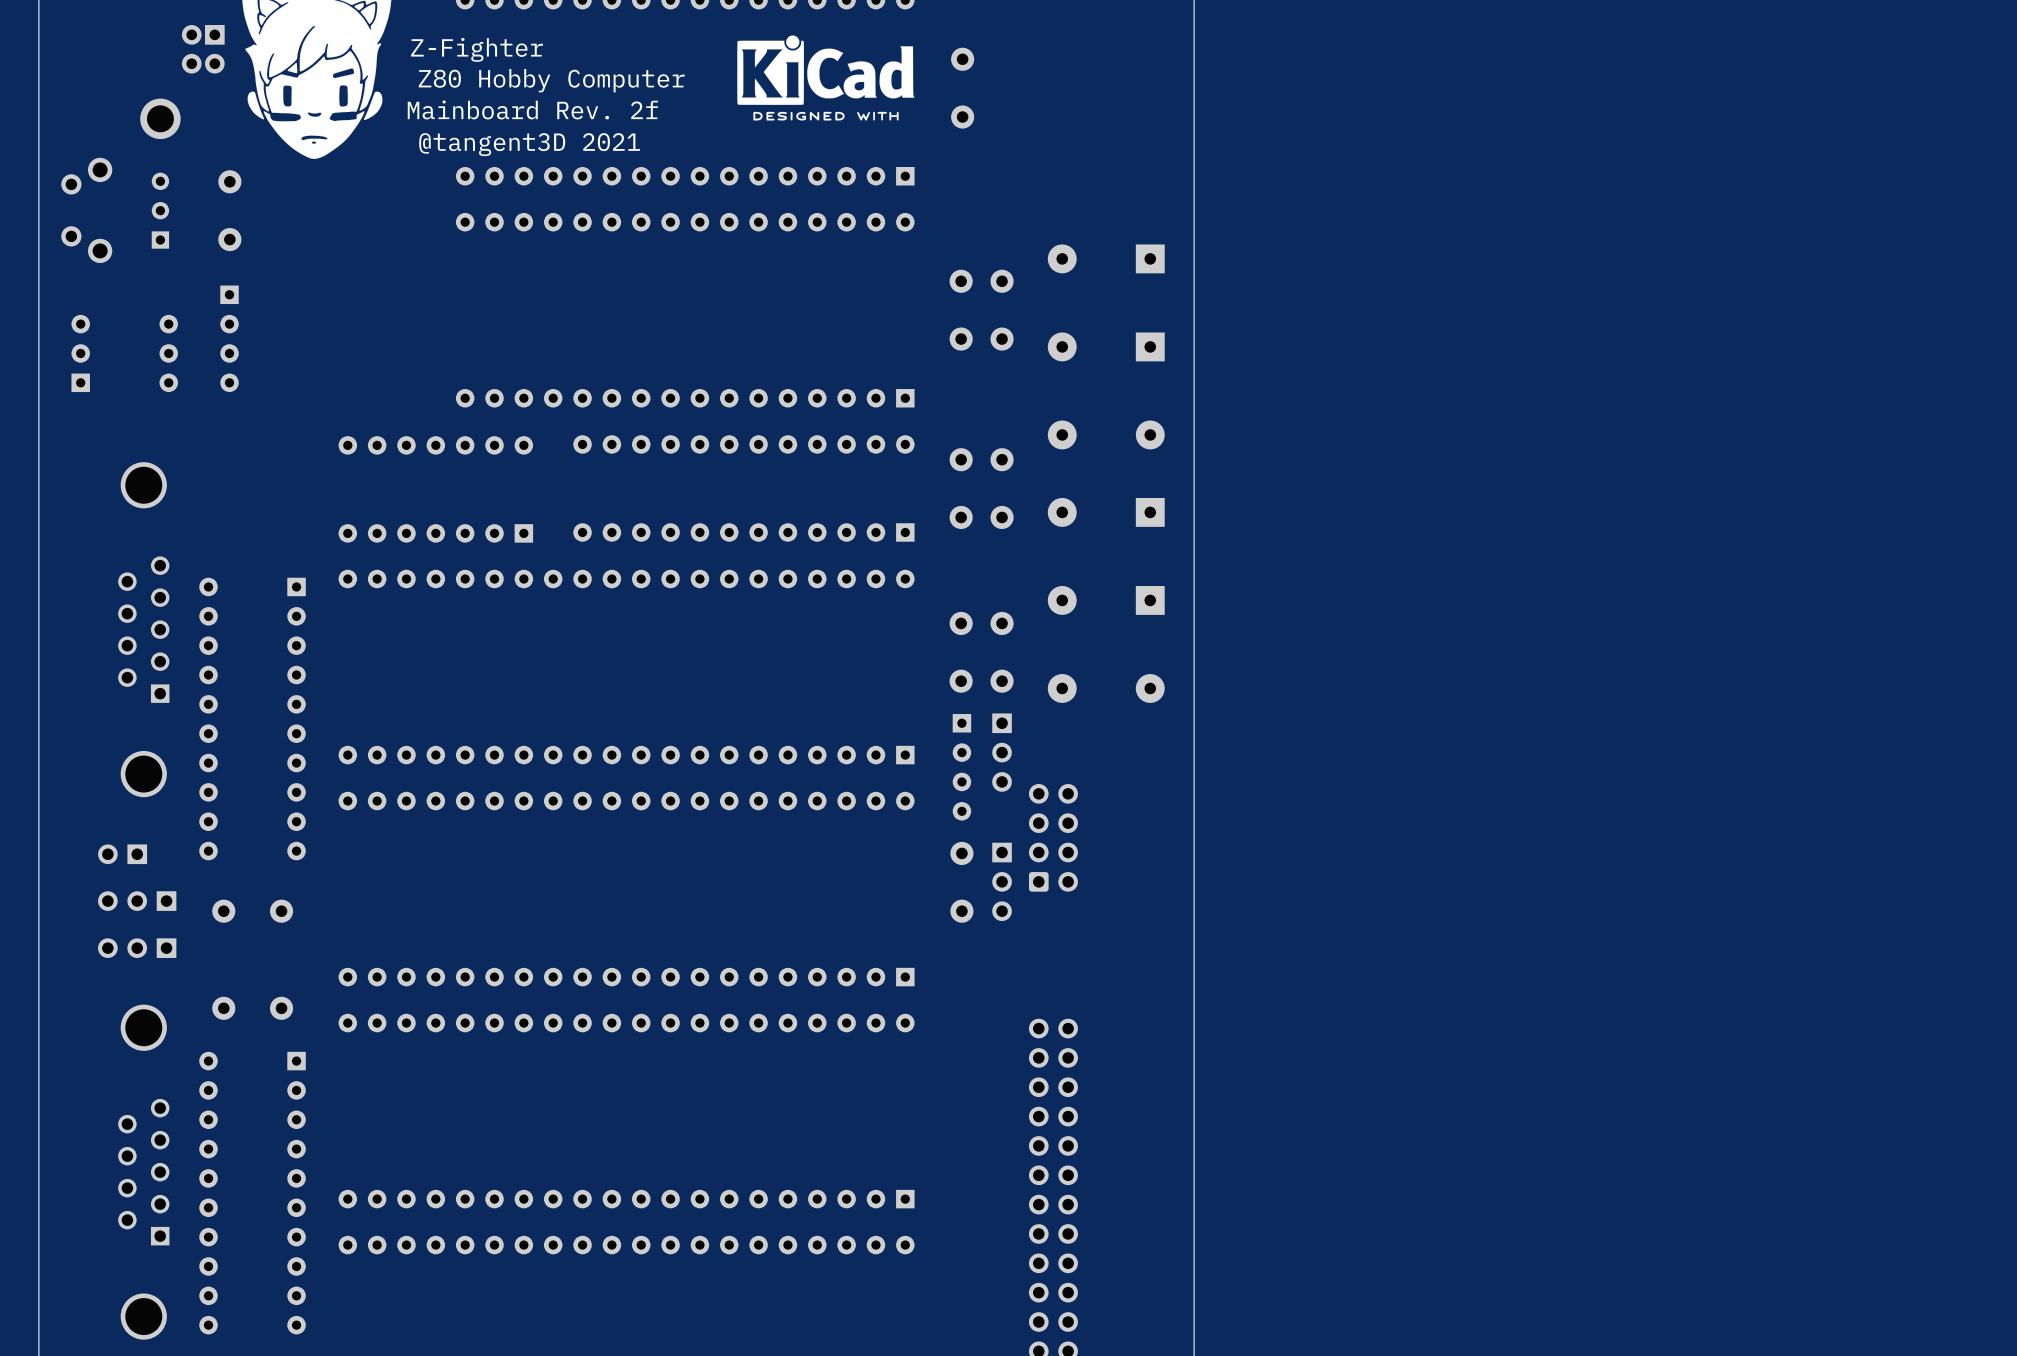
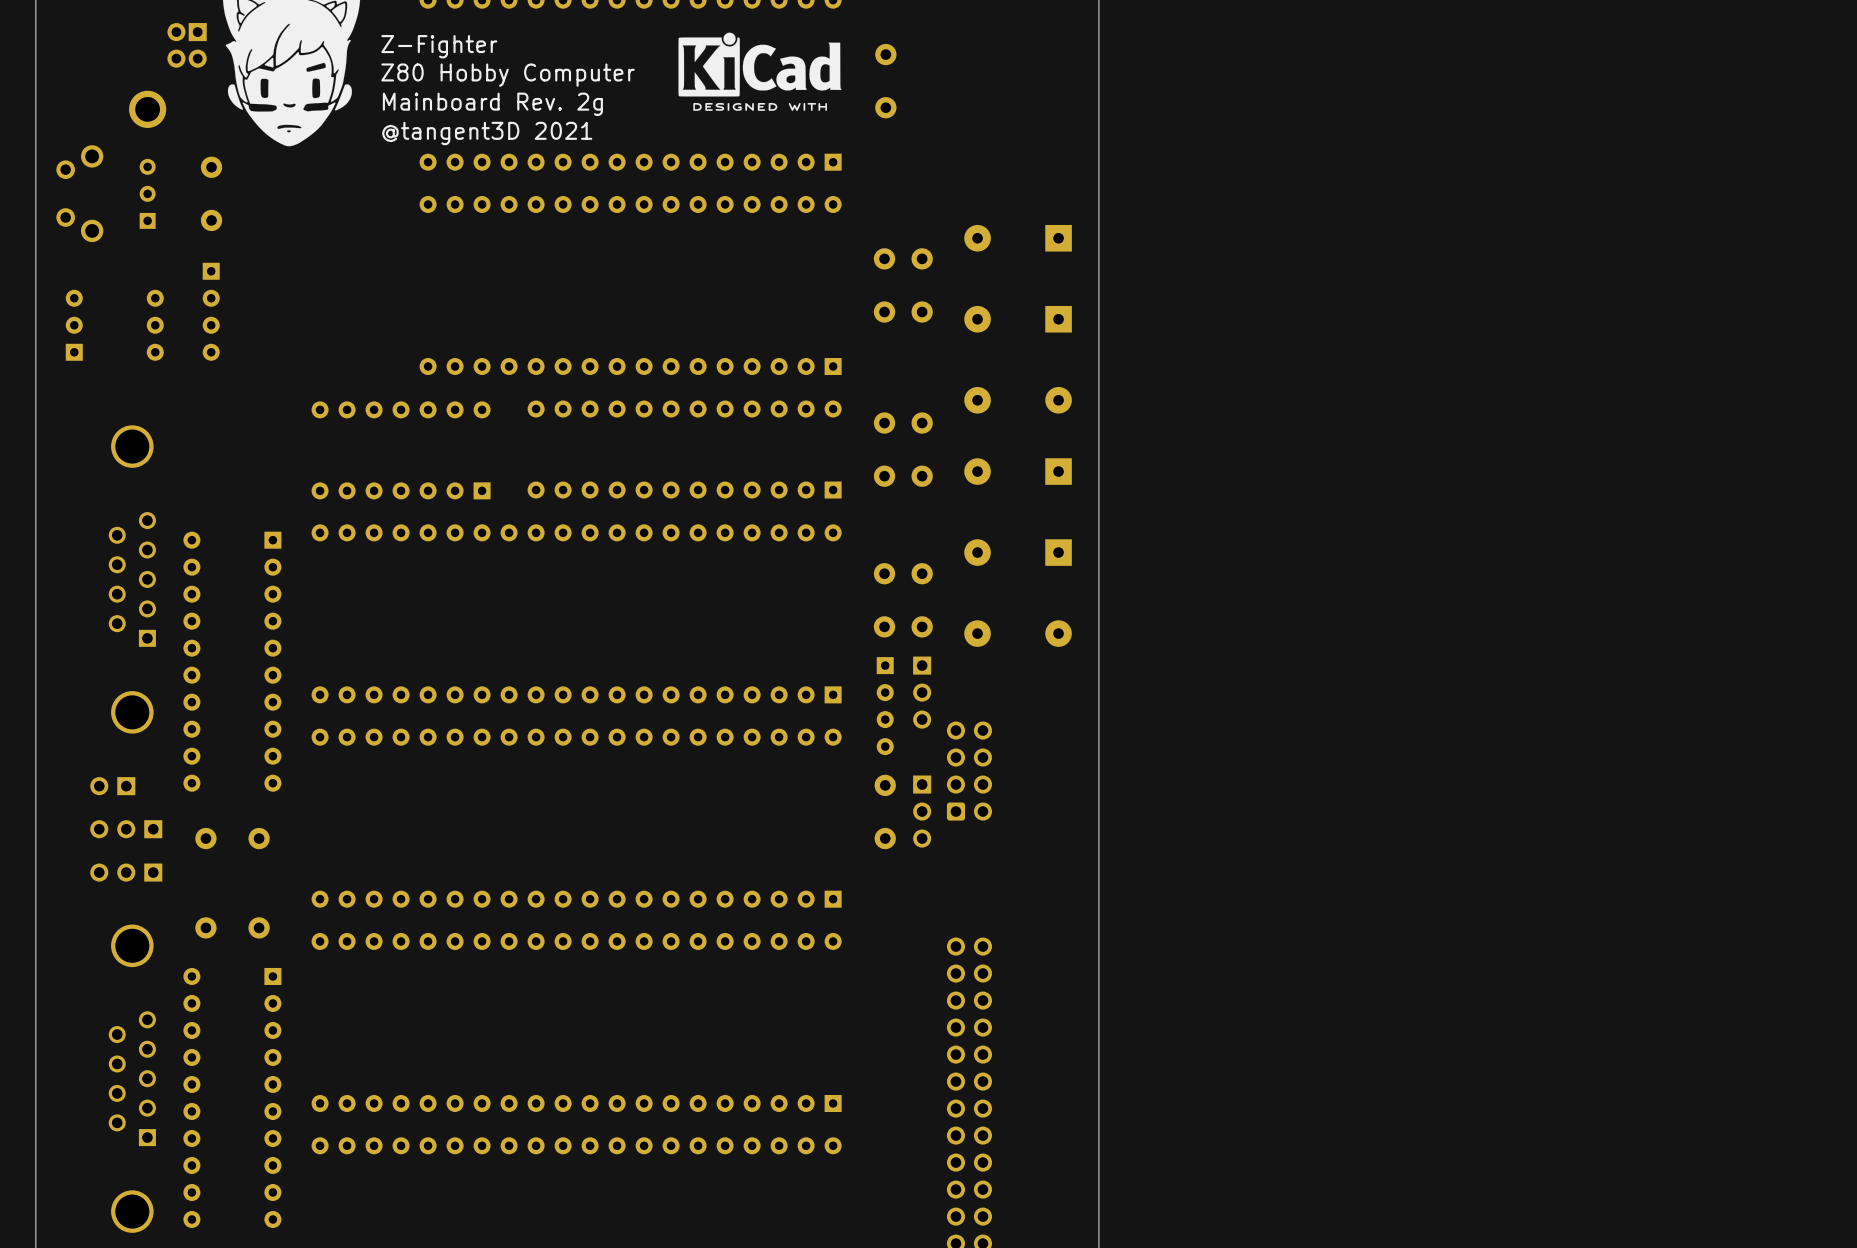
text: Mainboard Rev. 2f (532, 109) -> Mainboard Rev. 2g (492, 104)

